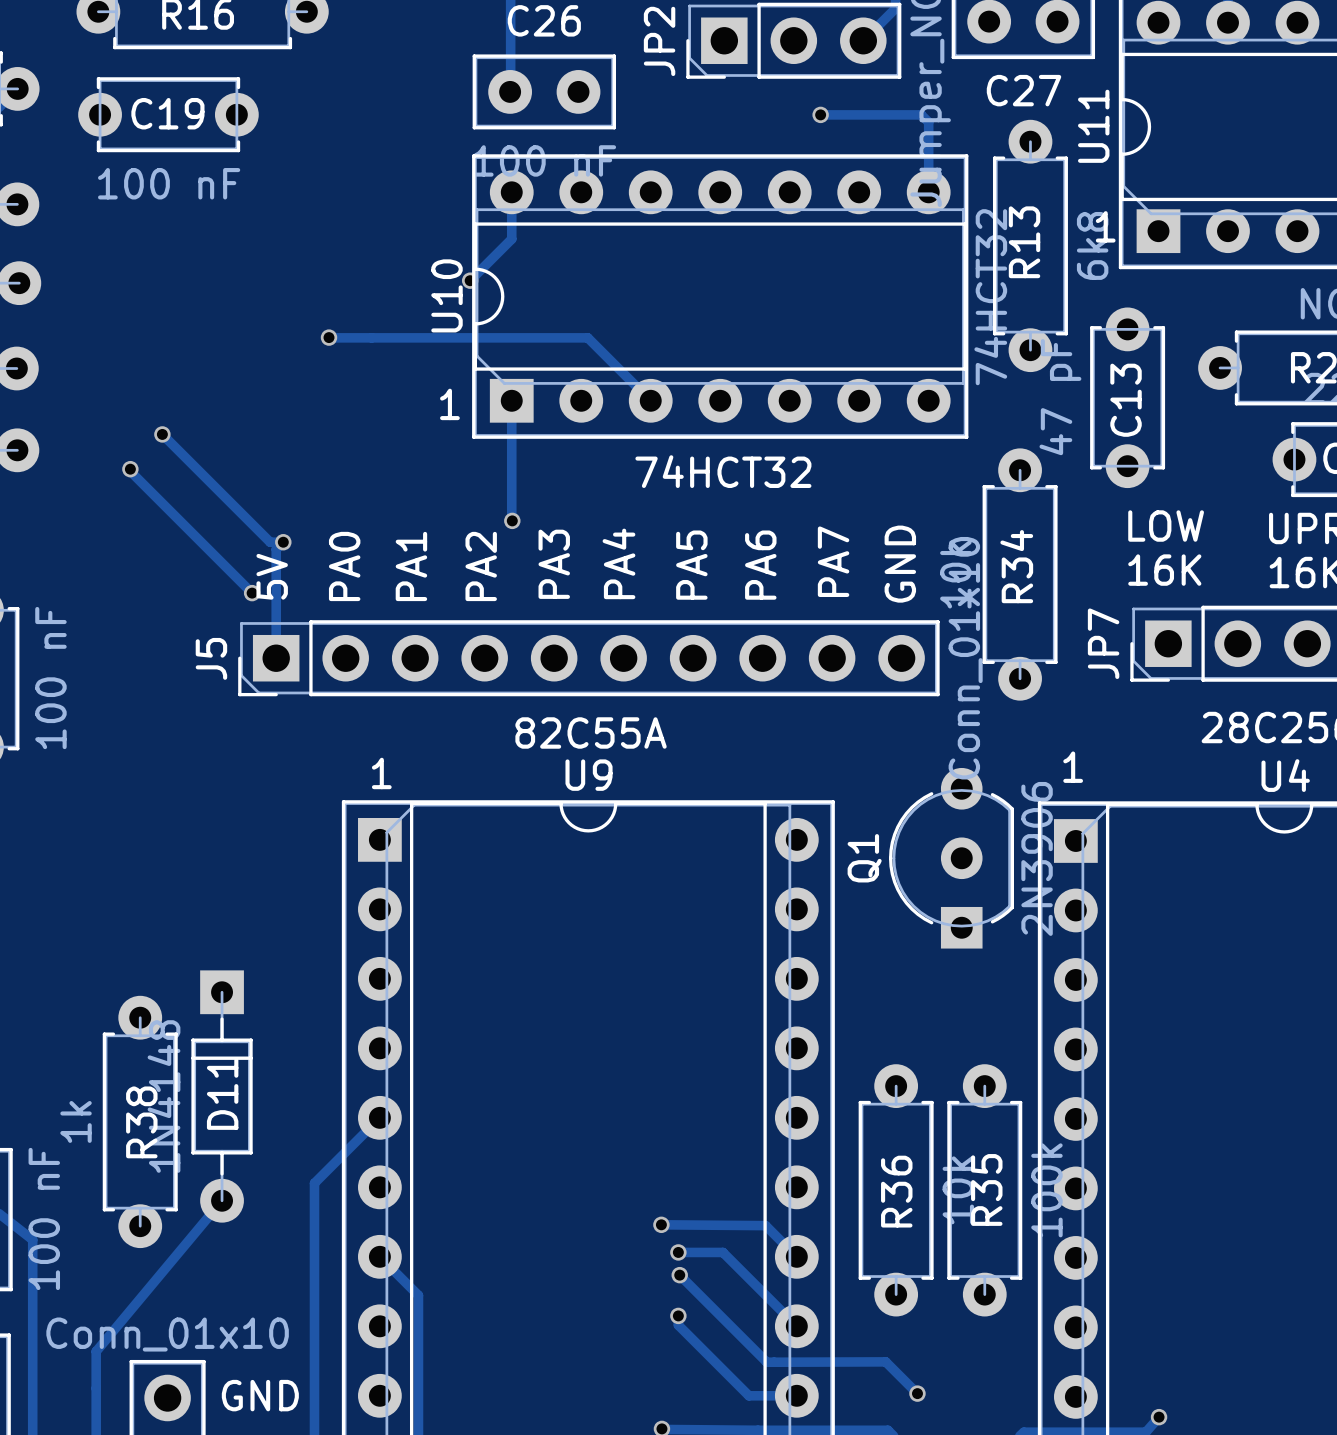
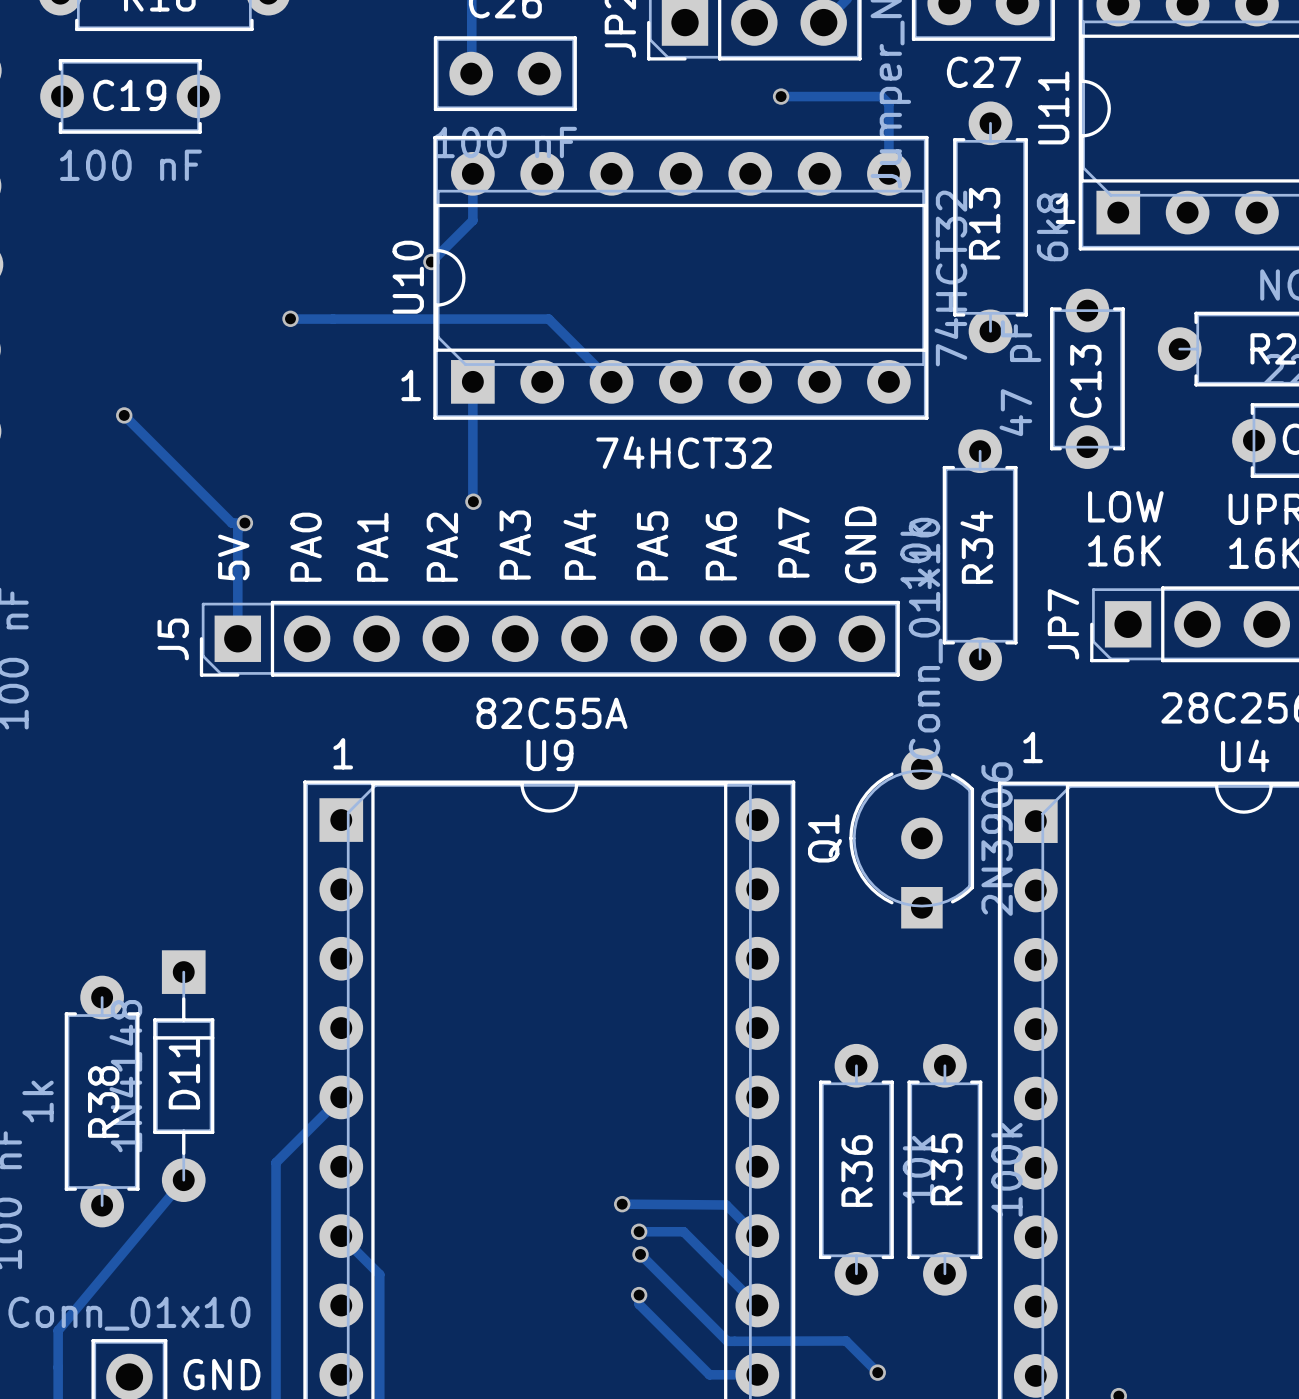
track: (130, 469) (130, 471) (252, 593) -> none
via: (130, 469) -> none
via: (252, 593) -> none

